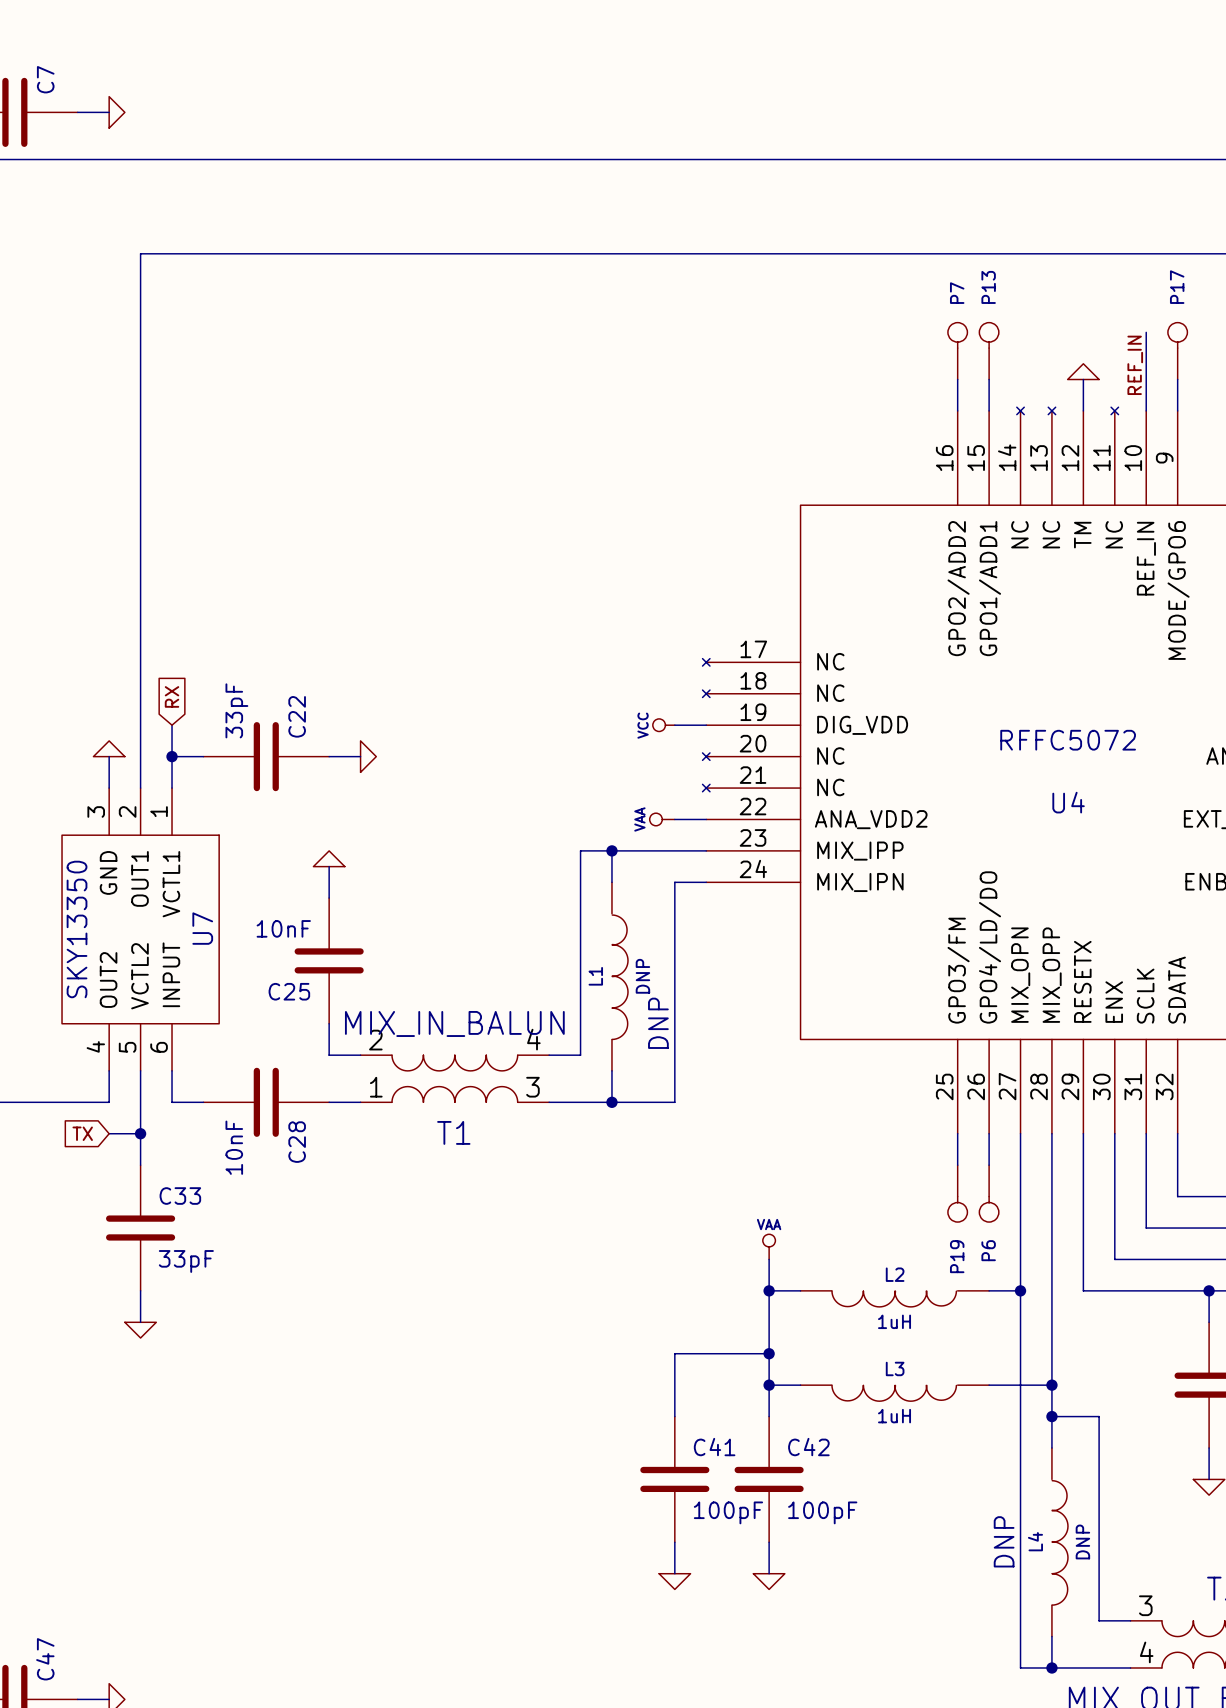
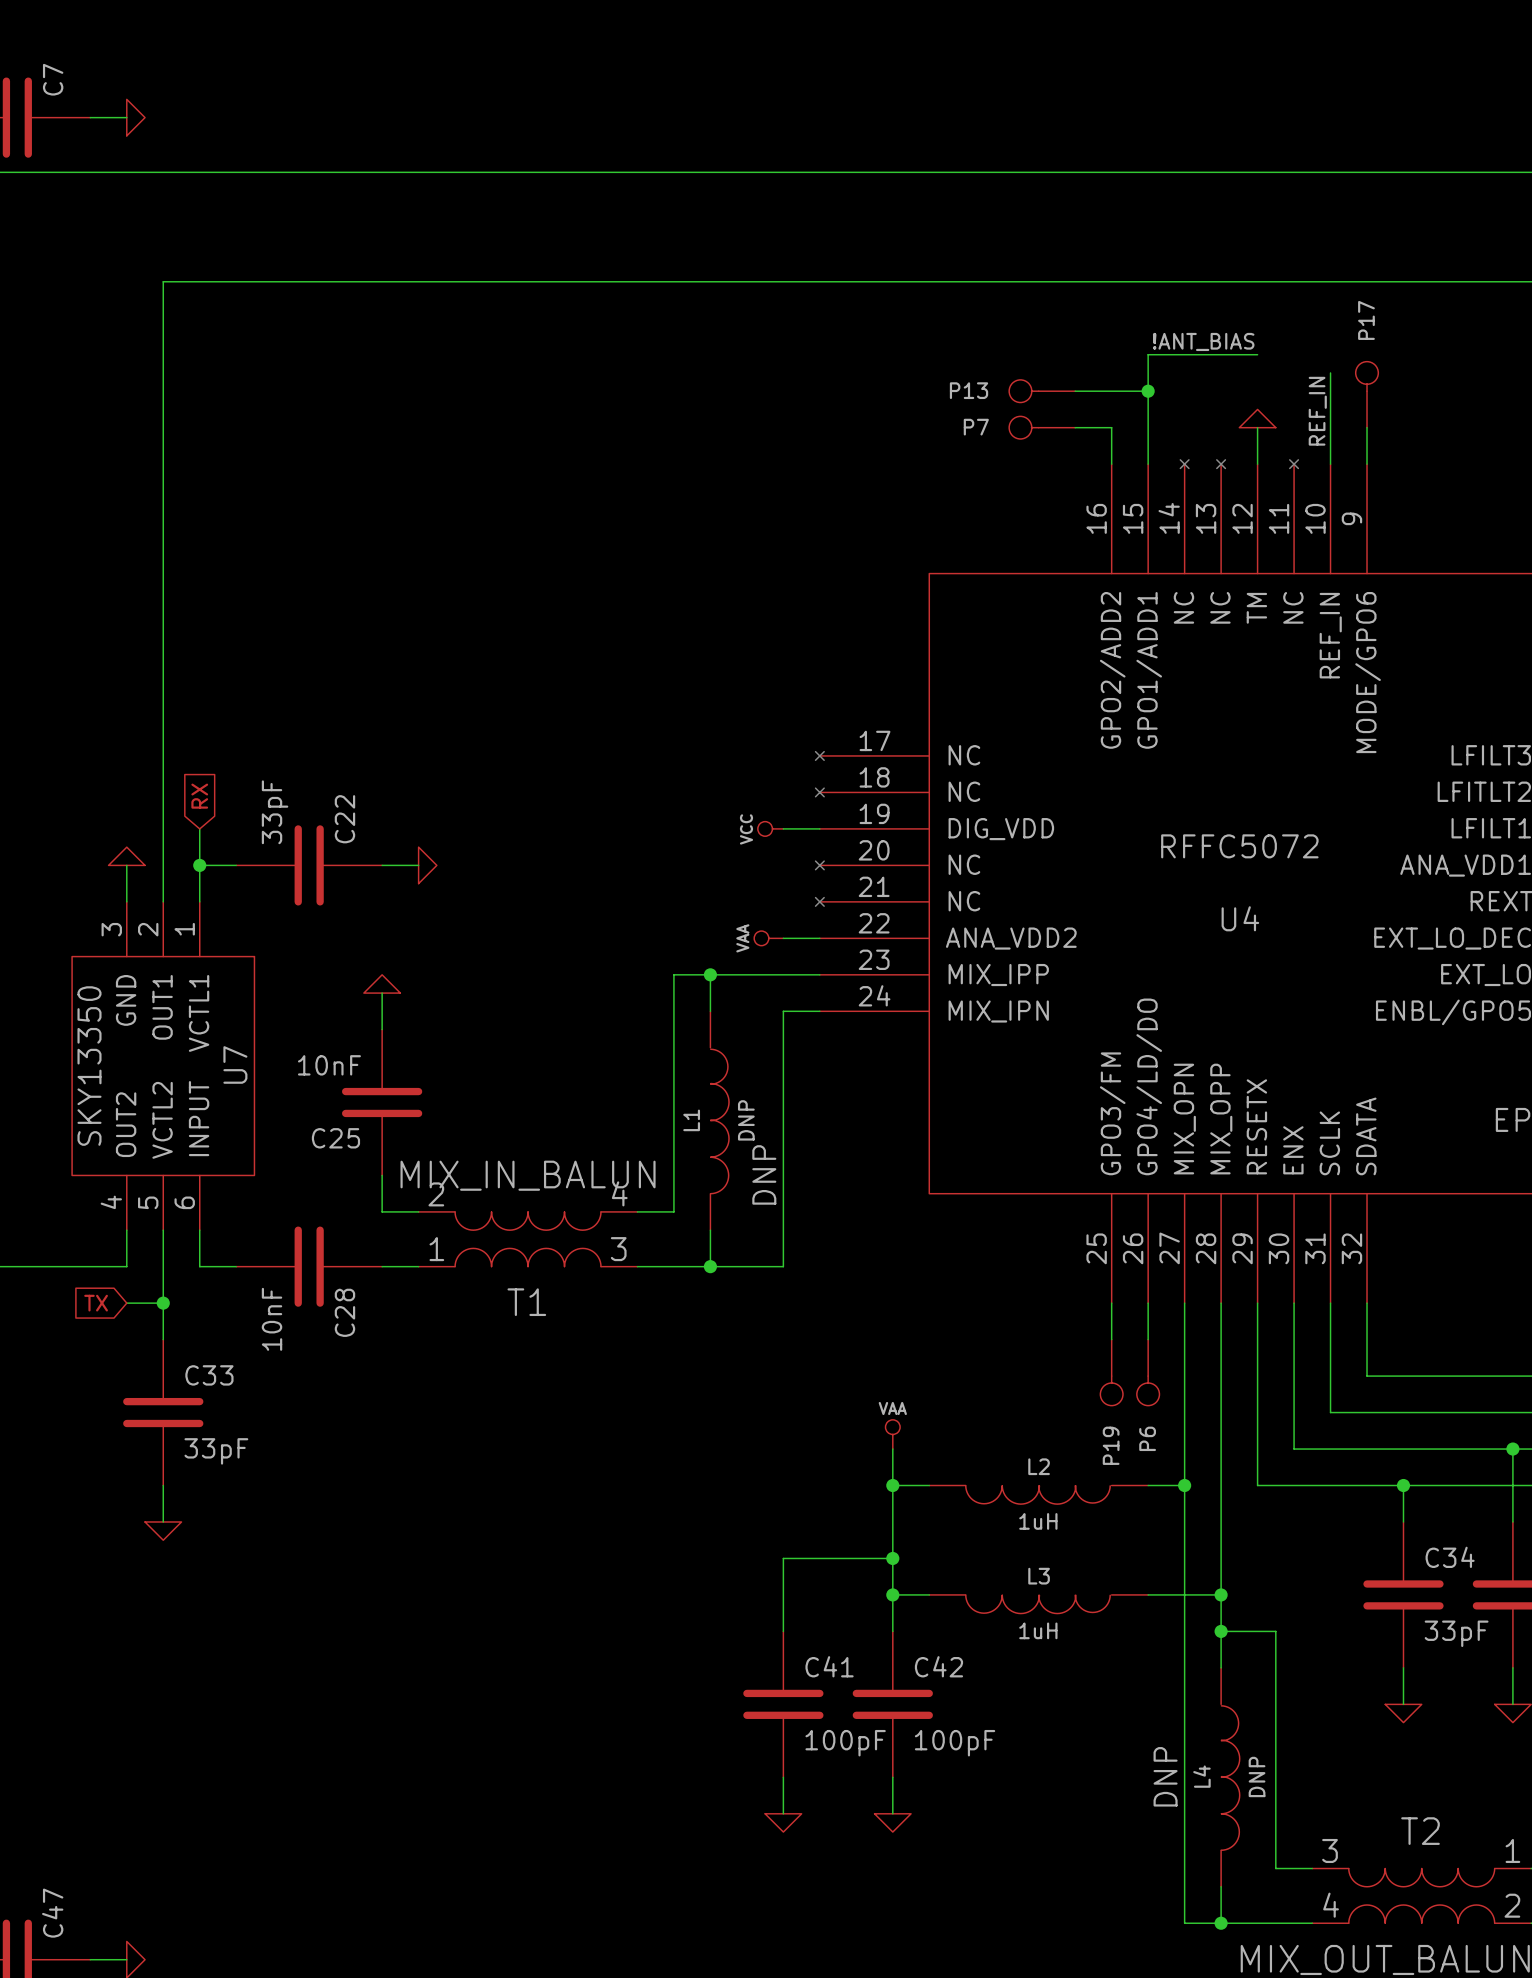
label: none -> !ANT_BIAS (1203, 341)
wire: none -> (1257, 354) (1148, 354) (1148, 427)
P7 rotation: 0° (957, 335) -> 90° counterclockwise (1023, 427)
P13 rotation: 0° (989, 335) -> 90° counterclockwise (1023, 391)
wire: none -> (1075, 391) (1148, 391)
junction: none -> (1148, 391)
P7 position: (957, 351) -> (1042, 427)
P13 position: (989, 351) -> (1042, 391)
wire: none -> (1075, 427) (1111, 427)

